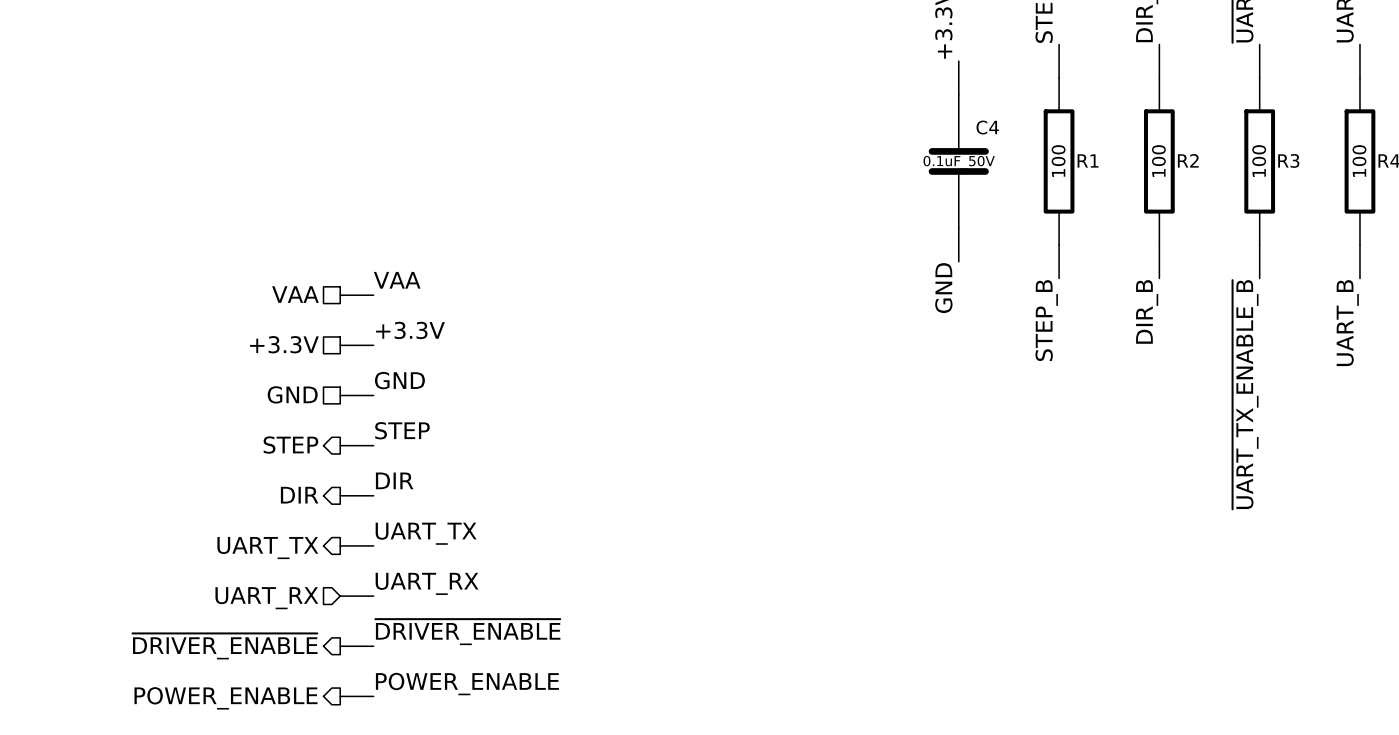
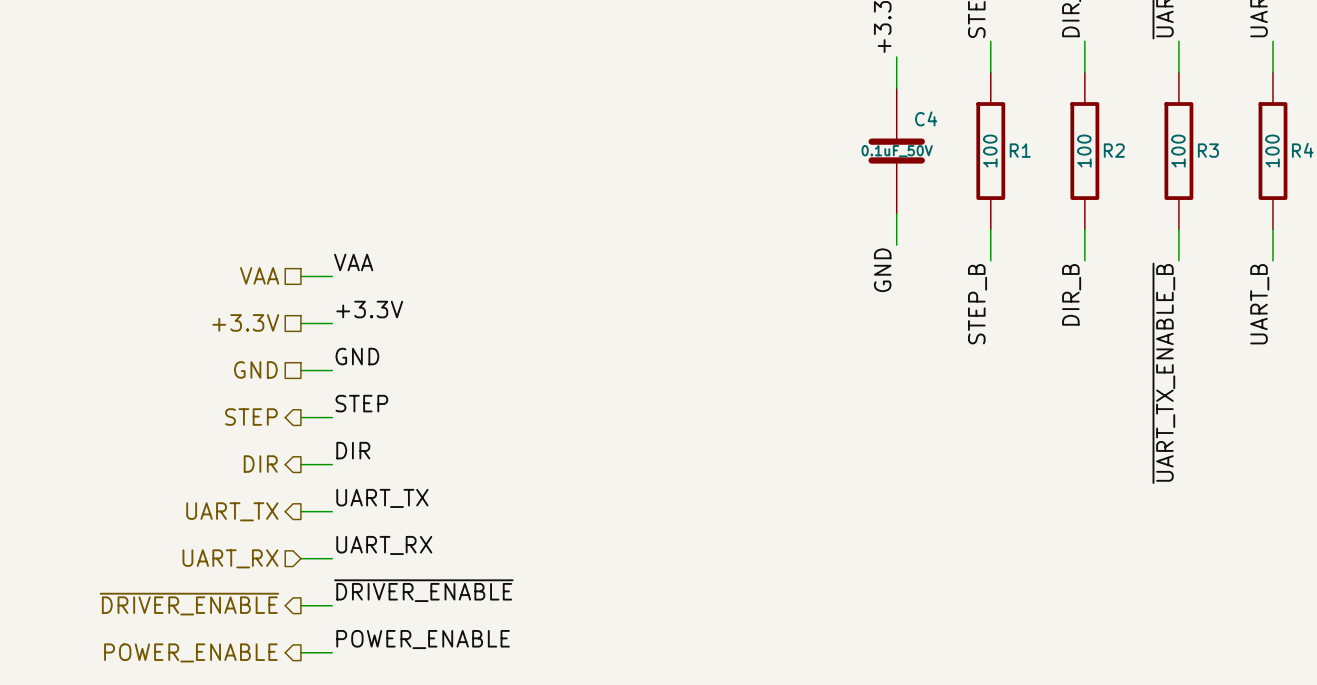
label position: VAA (397, 280) -> VAA (353, 262)
hierarchical label position: VAA (295, 294) -> VAA (259, 275)
wire: (356, 295) (373, 295) -> (300, 276) (316, 276)
label position: +3.3V (410, 330) -> +3.3V (369, 309)
hierarchical label position: +3.3V (284, 344) -> +3.3V (245, 322)
wire: (356, 345) (373, 345) -> (300, 323) (316, 323)
label position: GND (399, 380) -> GND (357, 356)
hierarchical label position: GND (292, 394) -> GND (255, 369)
wire: (356, 395) (373, 395) -> (300, 370) (316, 370)
label position: STEP (402, 430) -> STEP (361, 403)
hierarchical label position: STEP (290, 445) -> STEP (251, 417)
wire: (356, 445) (373, 445) -> (300, 417) (316, 417)
label position: DIR (394, 480) -> DIR (353, 450)
hierarchical label position: DIR (299, 495) -> DIR (260, 464)
wire: (356, 495) (373, 495) -> (300, 464) (316, 464)
label position: UART_TX (426, 533) -> UART_TX (382, 498)
wire: (356, 545) (373, 545) -> (300, 511) (316, 511)
hierarchical label position: UART_TX (267, 548) -> UART_TX (232, 511)
label position: UART_RX (427, 583) -> UART_RX (384, 545)
wire: (356, 596) (373, 596) -> (300, 558) (316, 558)
hierarchical label position: UART_RX (266, 598) -> UART_RX (230, 558)
label position: ~{DRIVER_ENABLE} (467, 632) -> ~{DRIVER_ENABLE} (423, 590)
hierarchical label position: ~{DRIVER_ENABLE} (224, 646) -> ~{DRIVER_ENABLE} (189, 604)
wire: (356, 646) (373, 646) -> (300, 605) (316, 605)
label position: POWER_ENABLE (467, 684) -> POWER_ENABLE (423, 639)
wire: (356, 696) (373, 696) -> (300, 652) (316, 652)
hierarchical label position: POWER_ENABLE (226, 698) -> POWER_ENABLE (190, 652)

